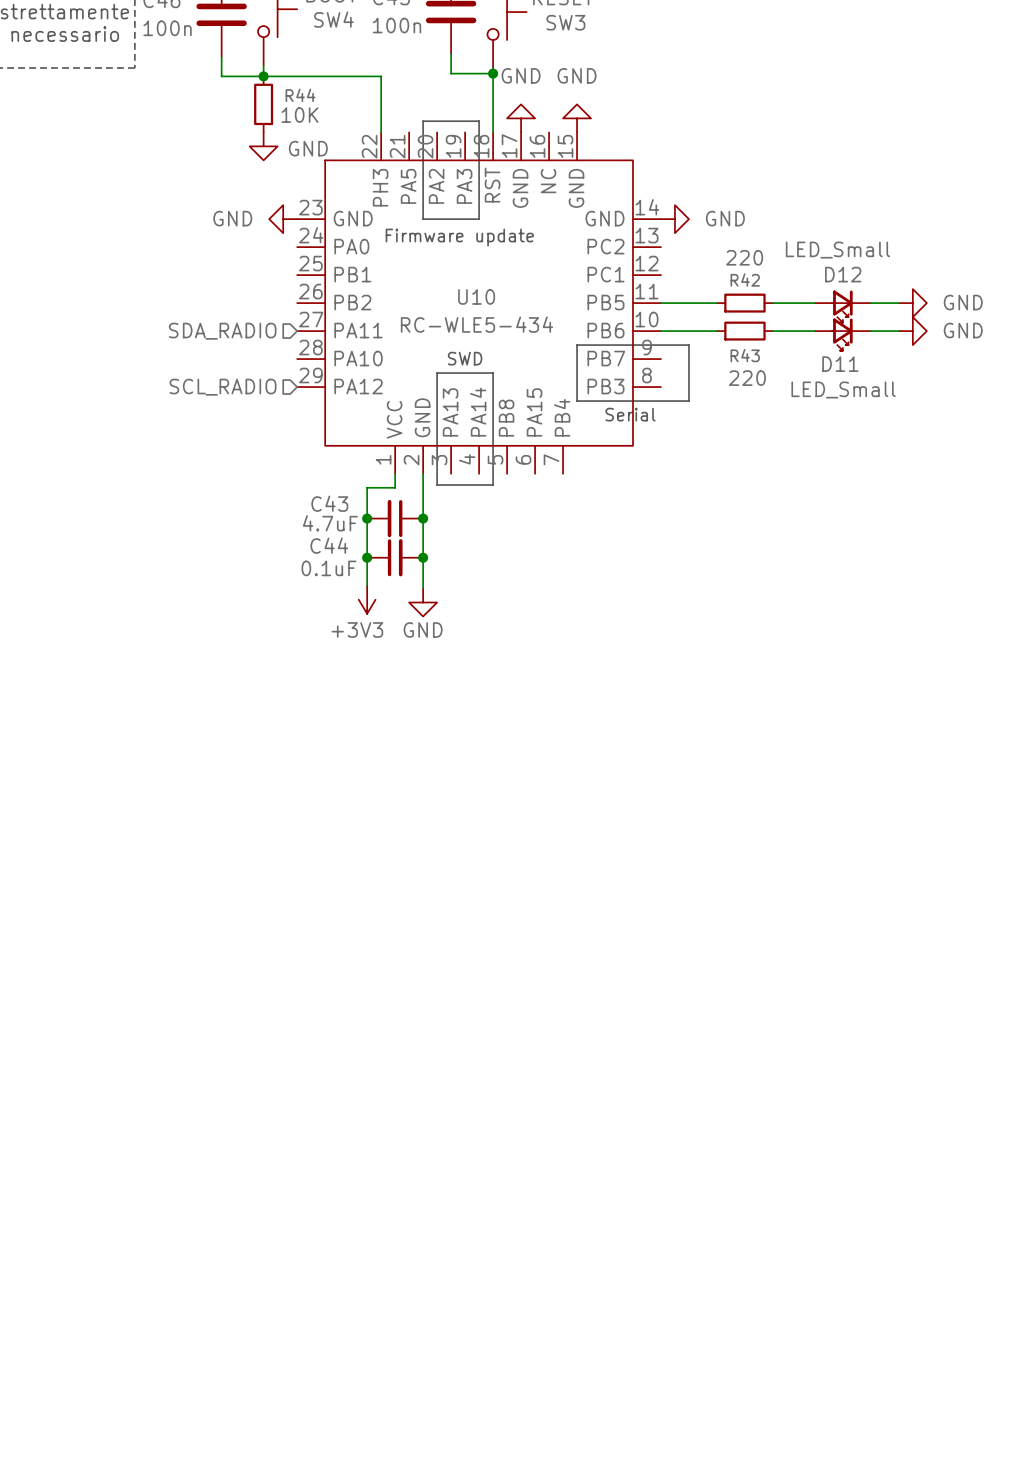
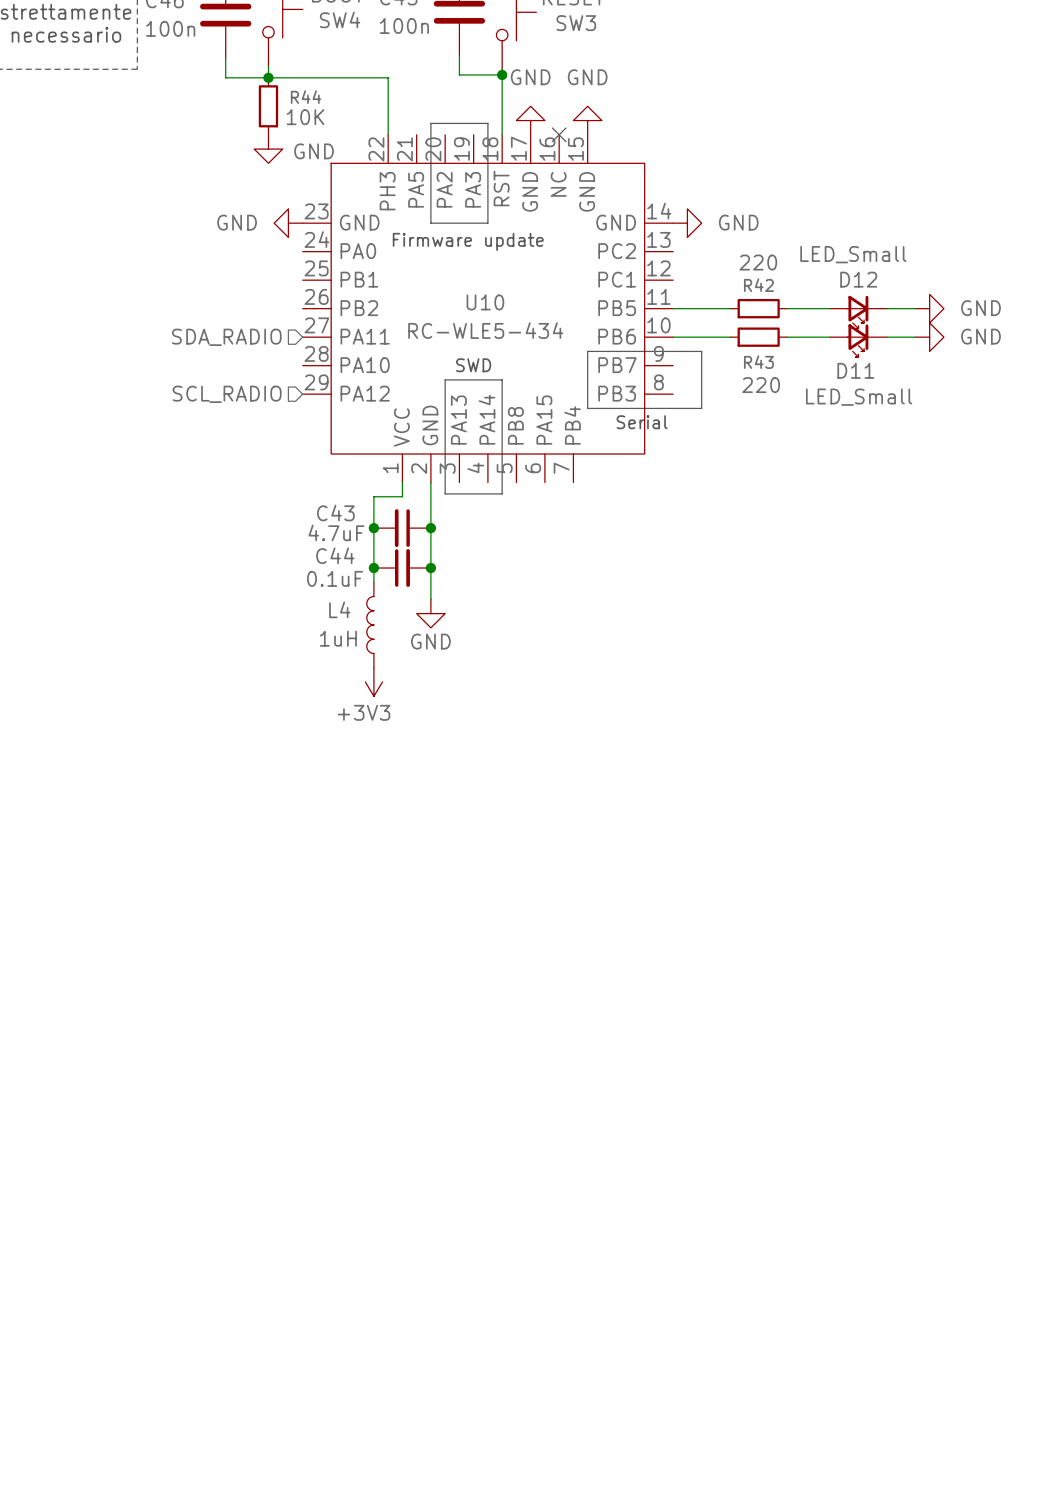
no-connect mark: none -> (559, 134)
power symbol position: +3V3 (367, 599) -> +3V3 (373, 682)
L4: none -> 1uH (370, 625)

